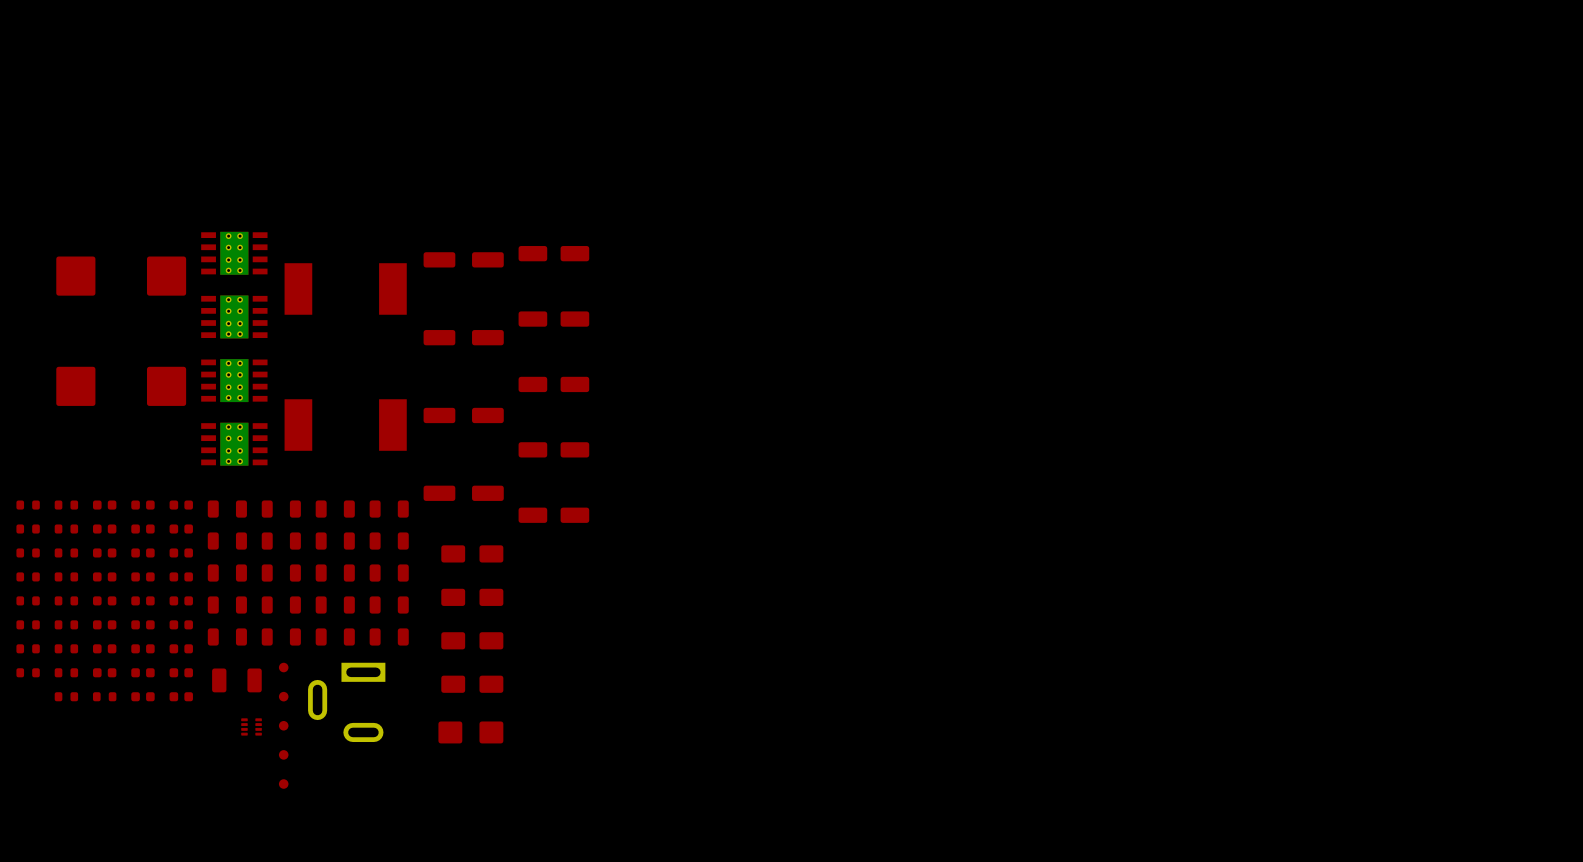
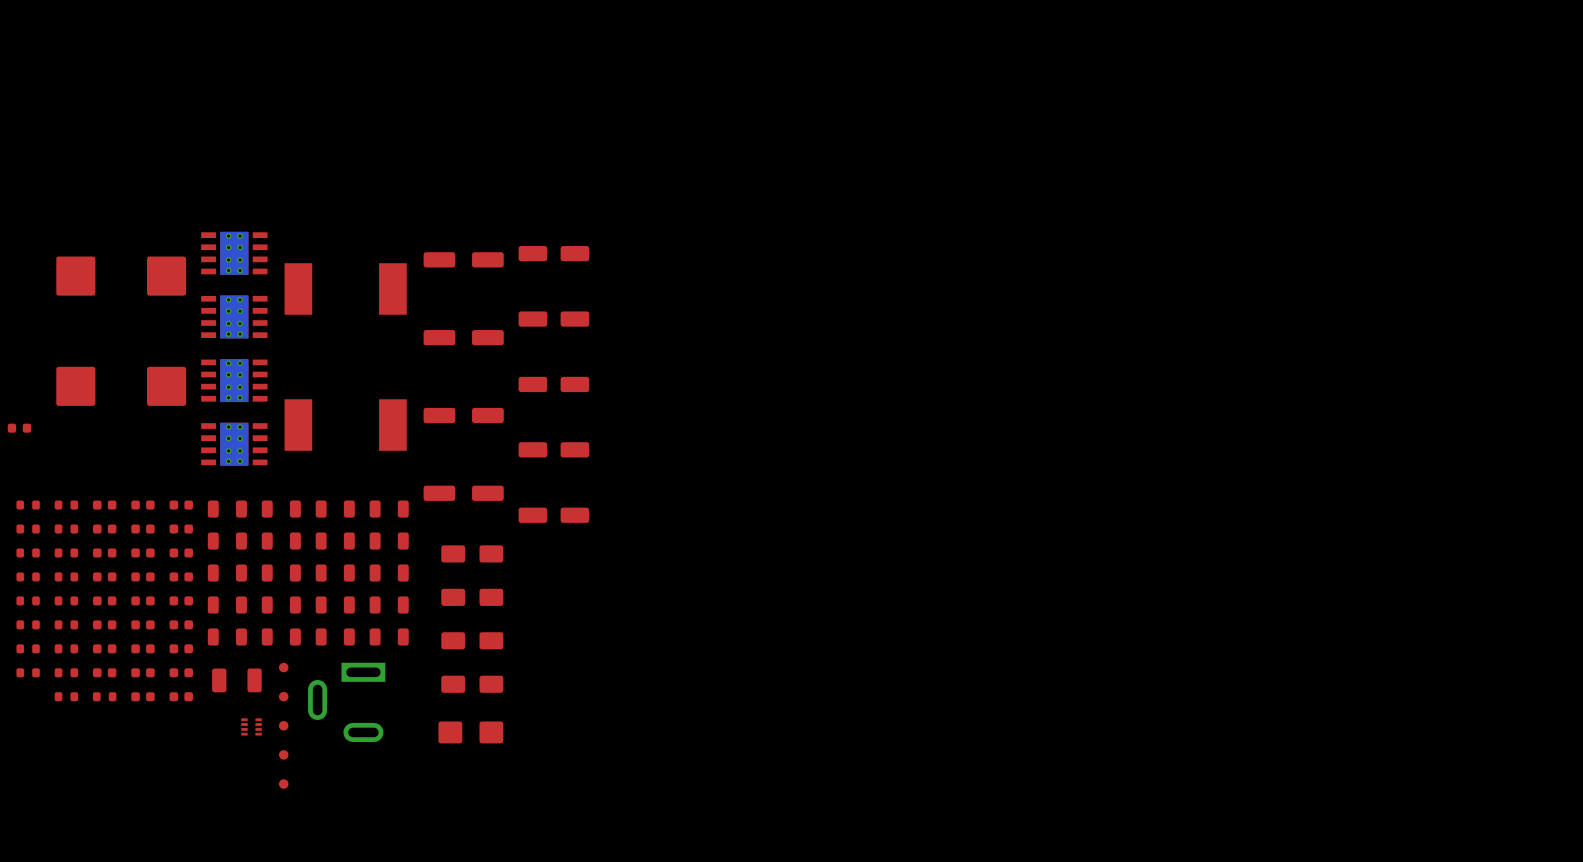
part: none -> (19, 428)

